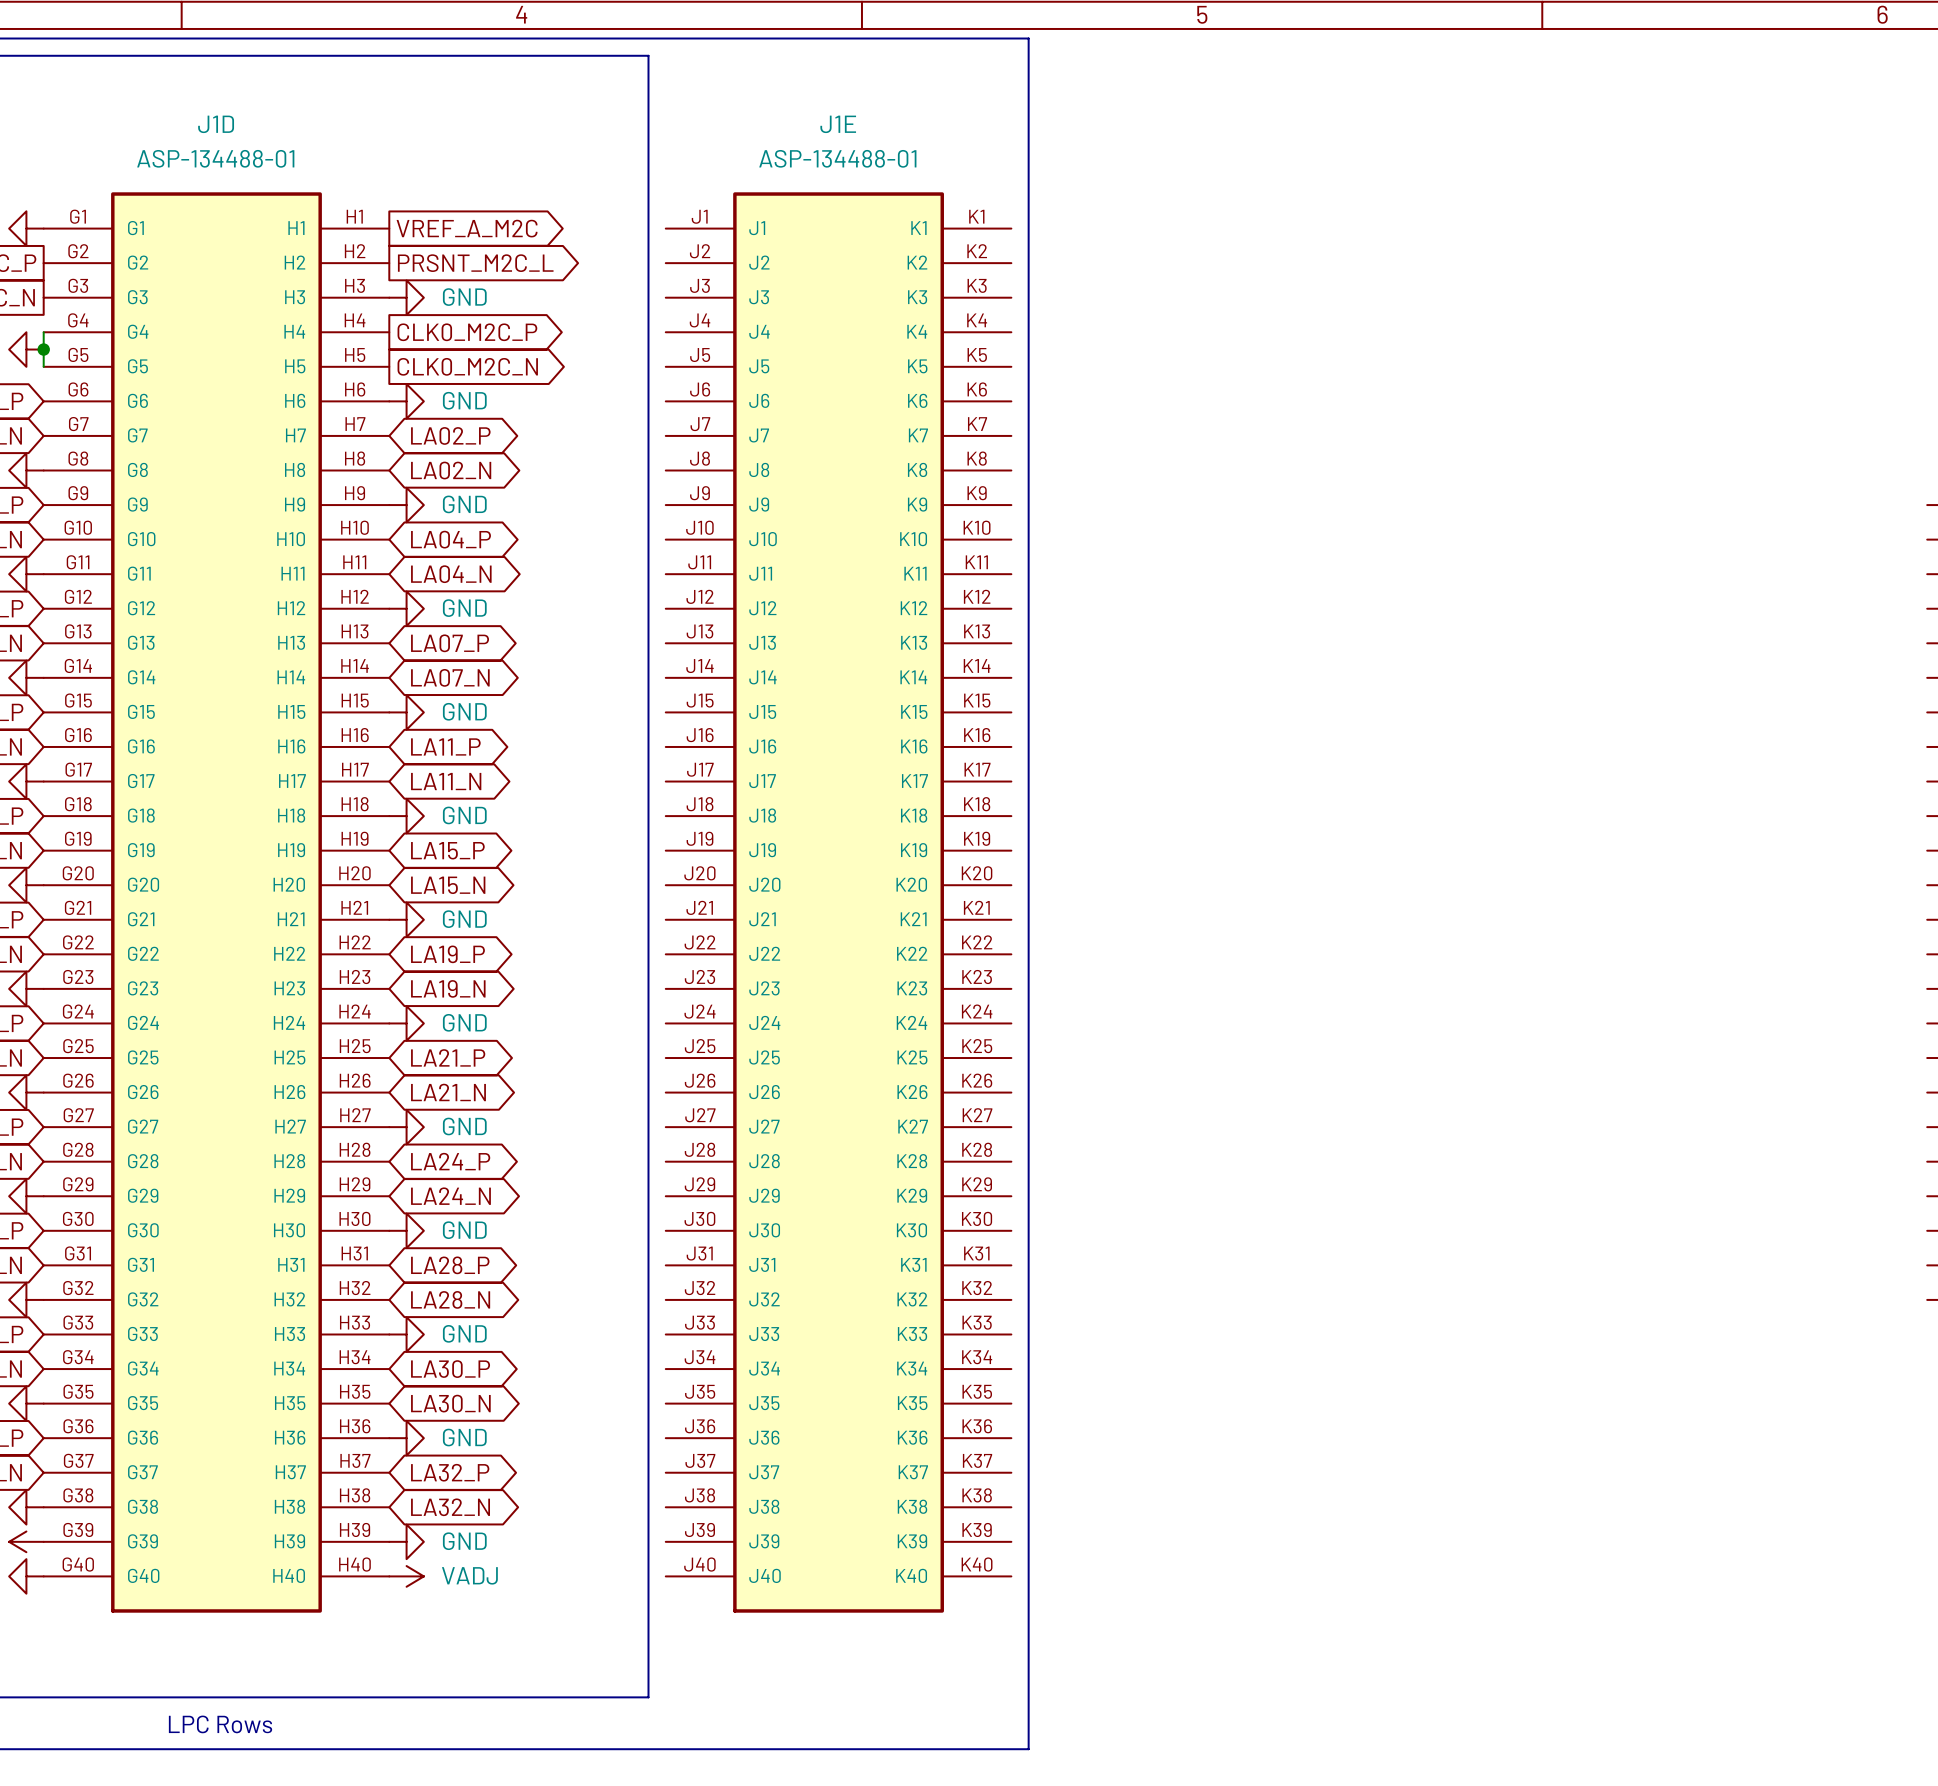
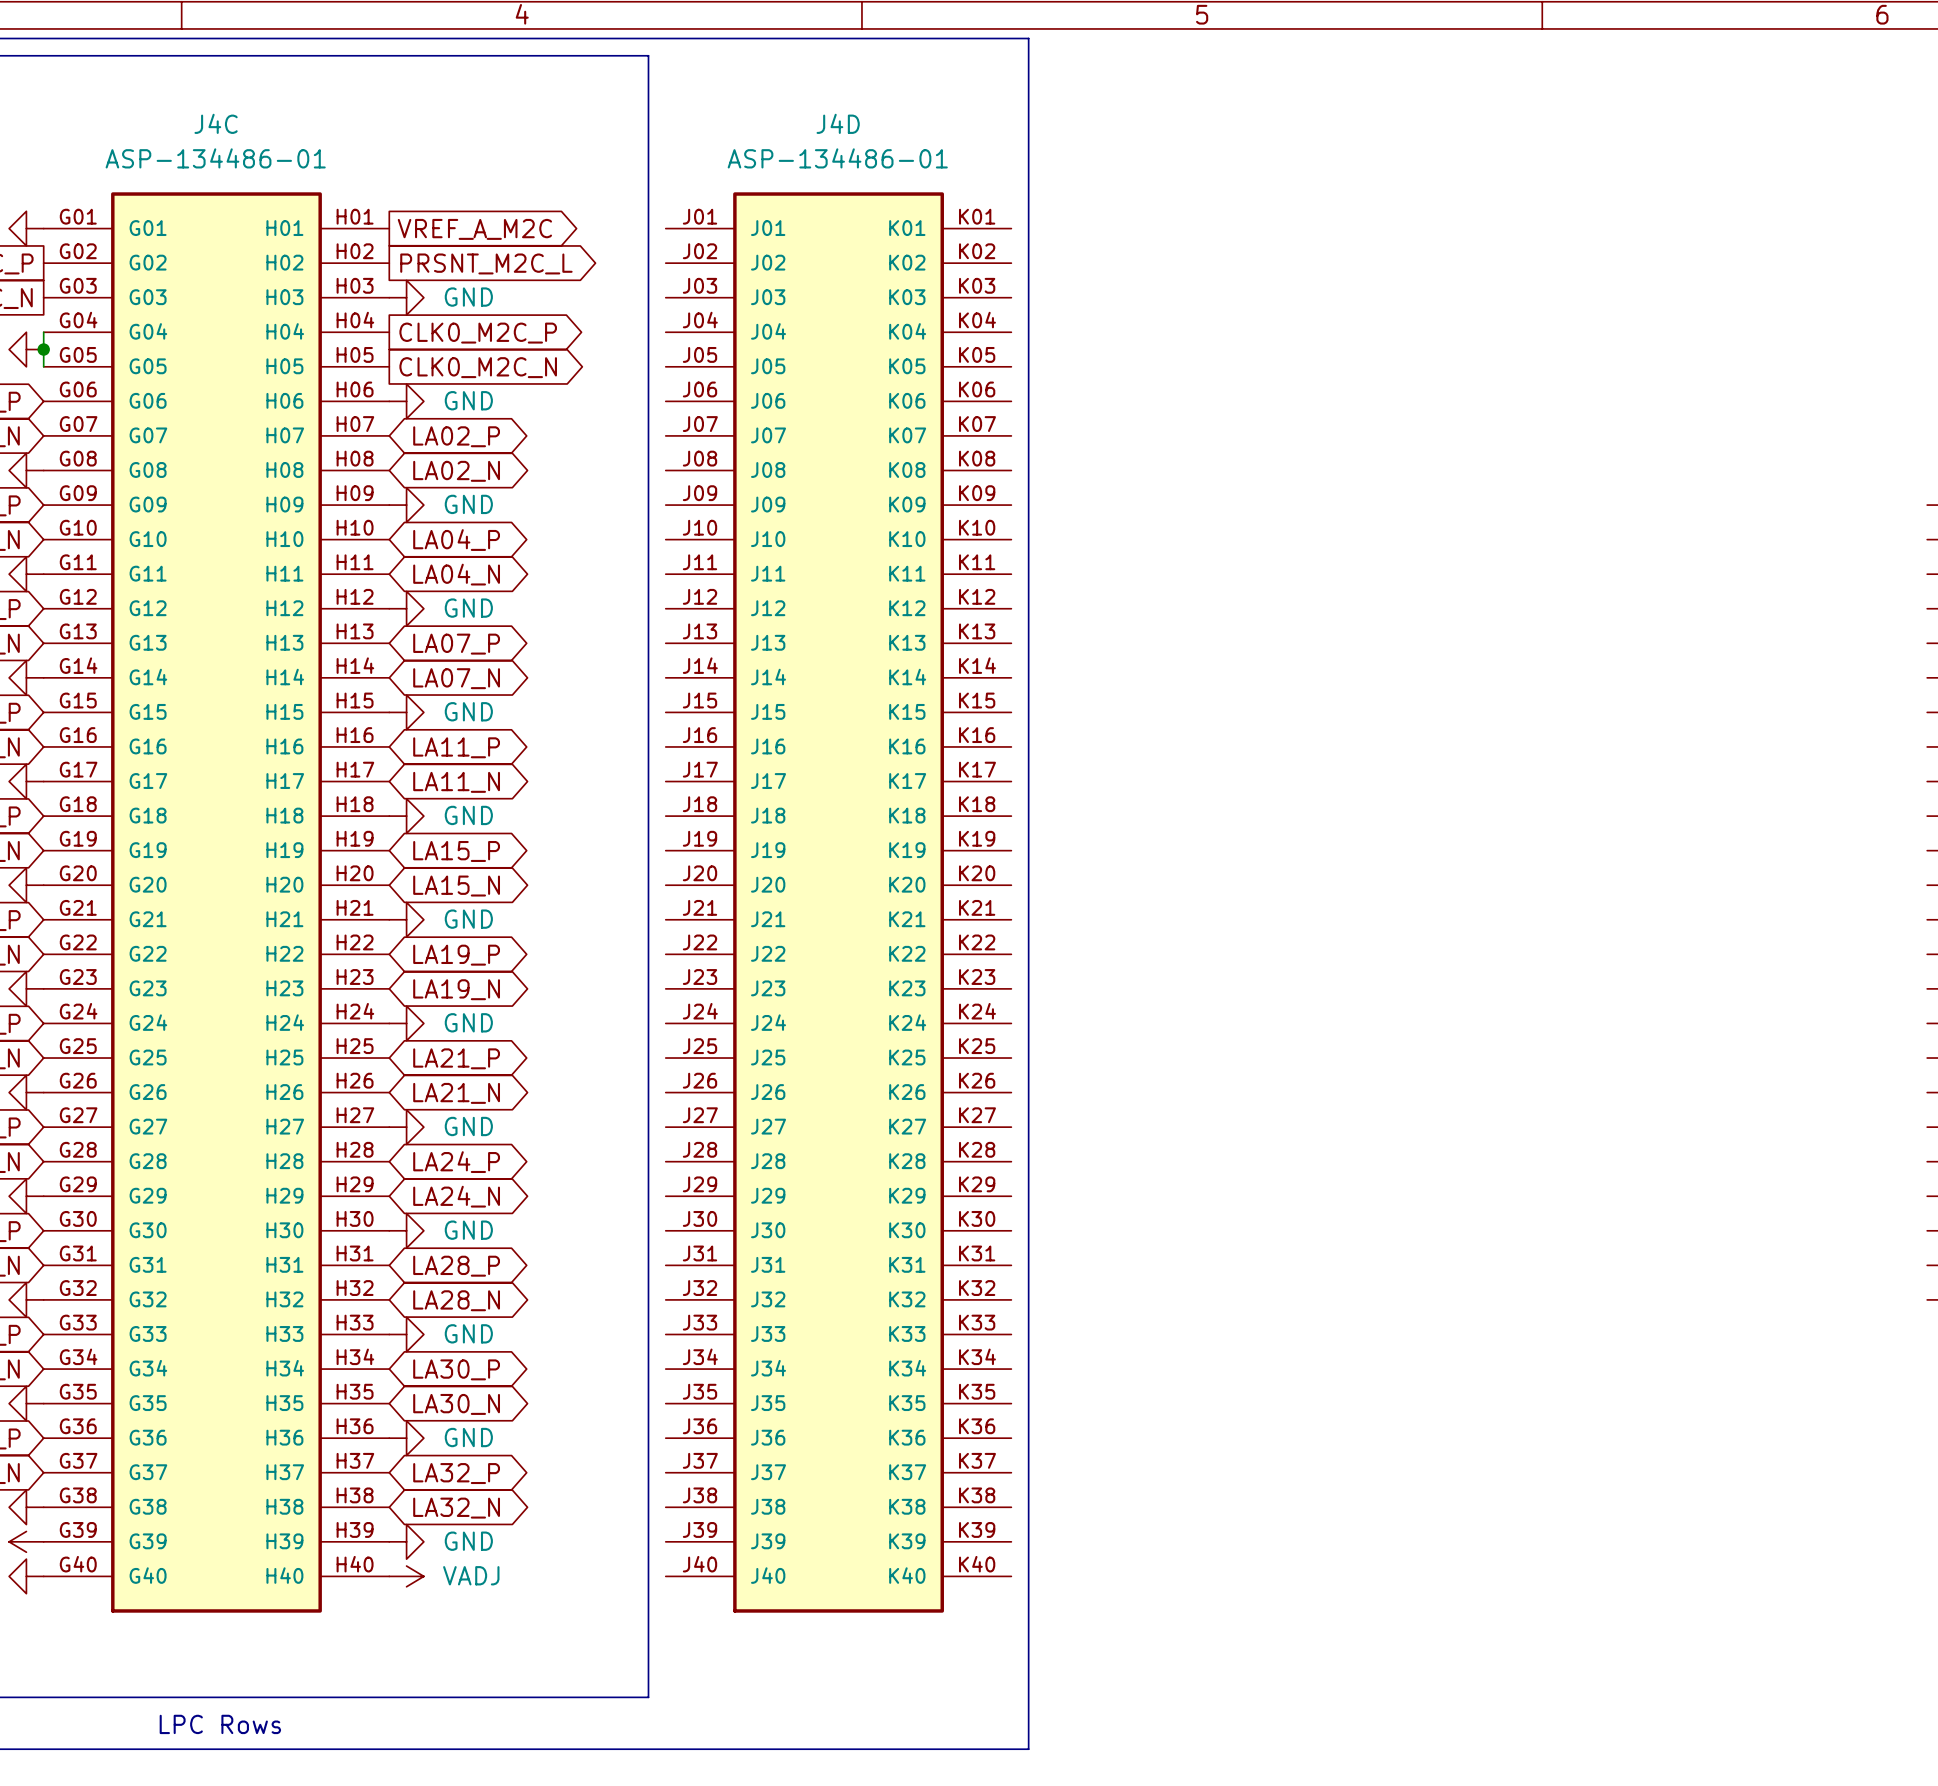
J1D name: J1D (216, 124) -> J4C (216, 123)
J1E name: J1E (838, 124) -> J4D (838, 123)
J1D value: ASP-134488-01 (215, 158) -> ASP-134486-01 (215, 158)
J1E value: ASP-134488-01 (837, 158) -> ASP-134486-01 (837, 158)
J1D symbol: [43, 192, 390, 1613] -> [43, 192, 390, 1613]
J1E symbol: [665, 192, 1012, 1613] -> [665, 192, 1012, 1613]

